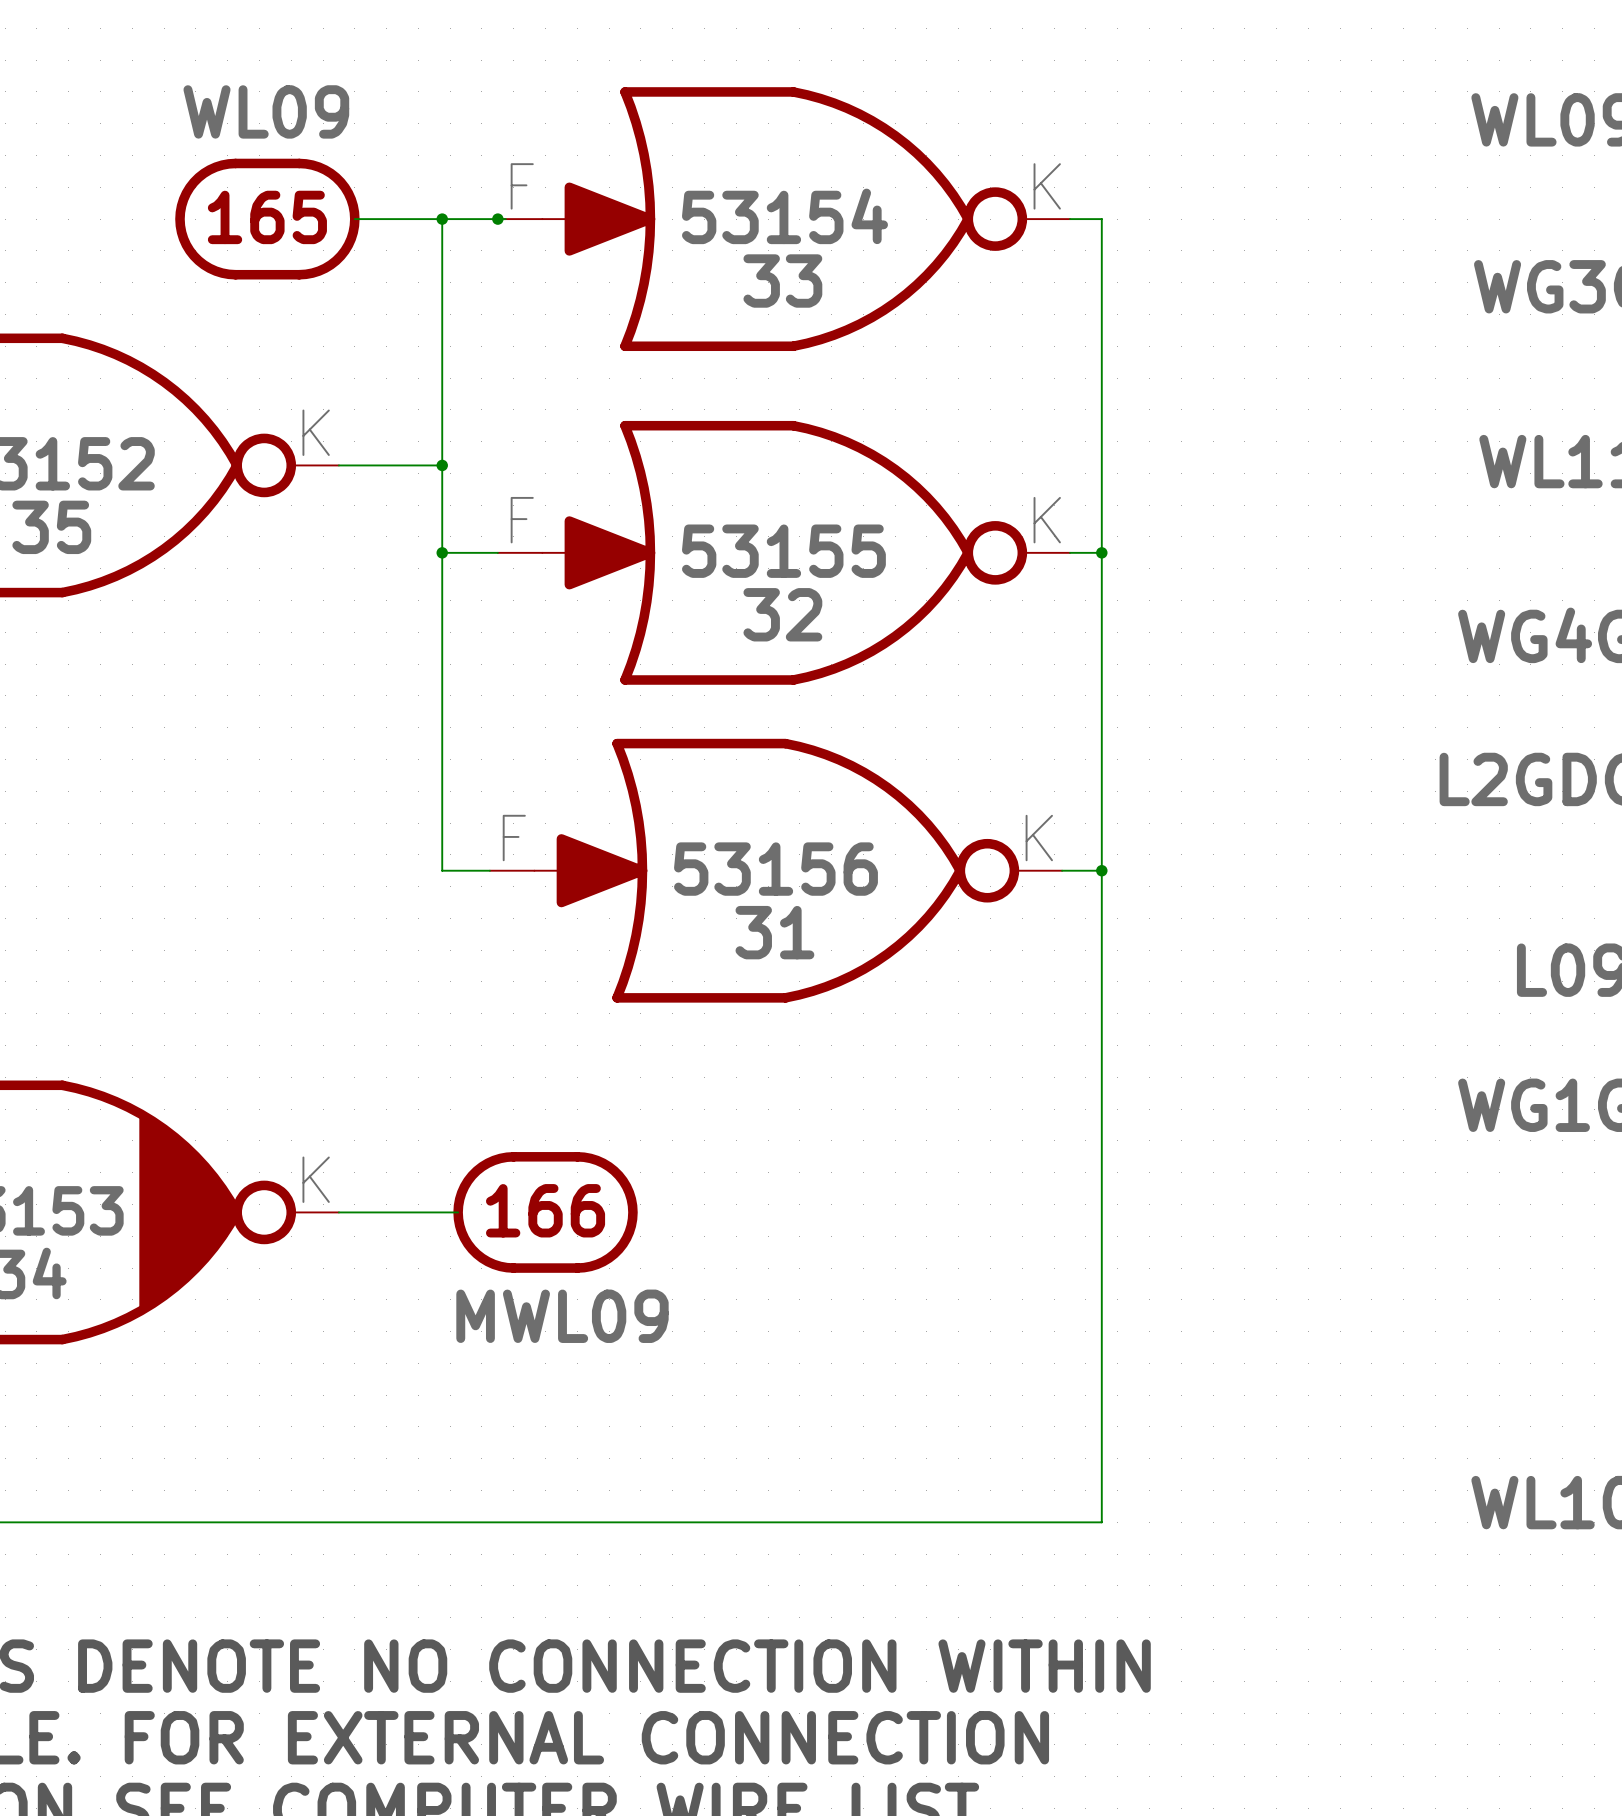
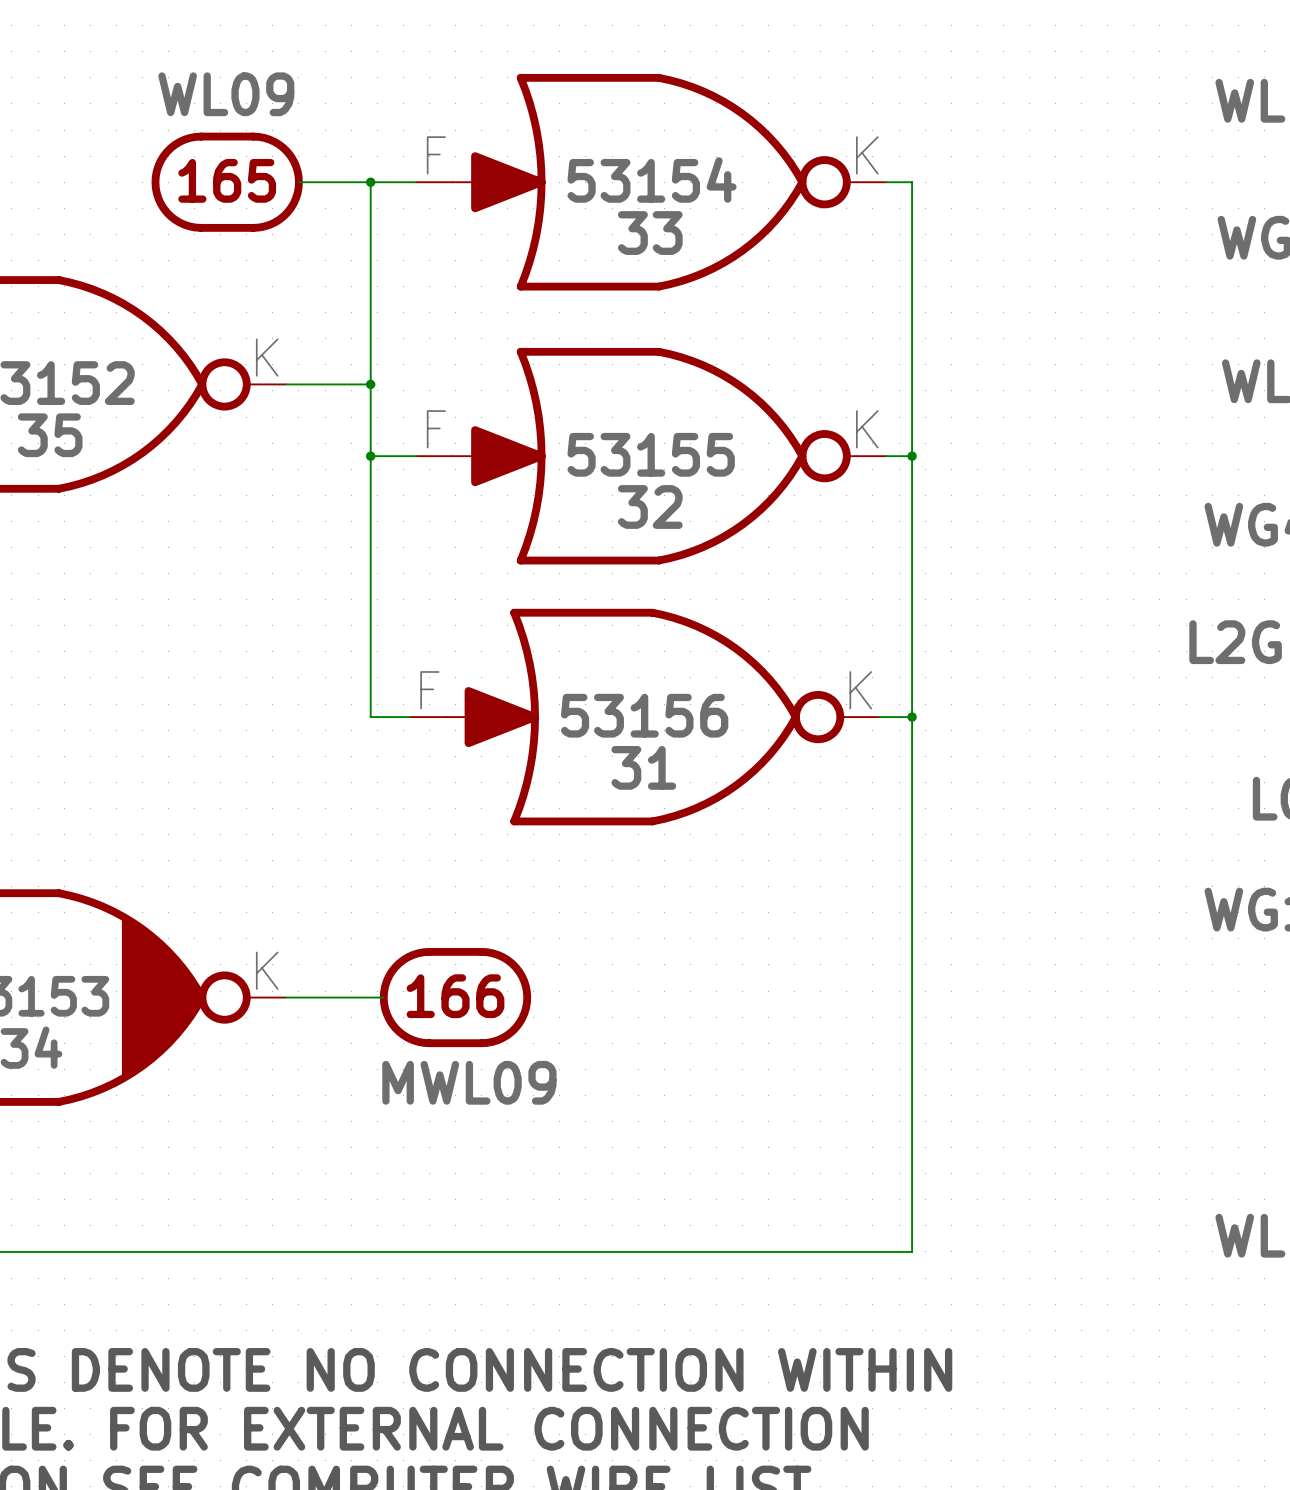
junction: (497, 219) -> none

